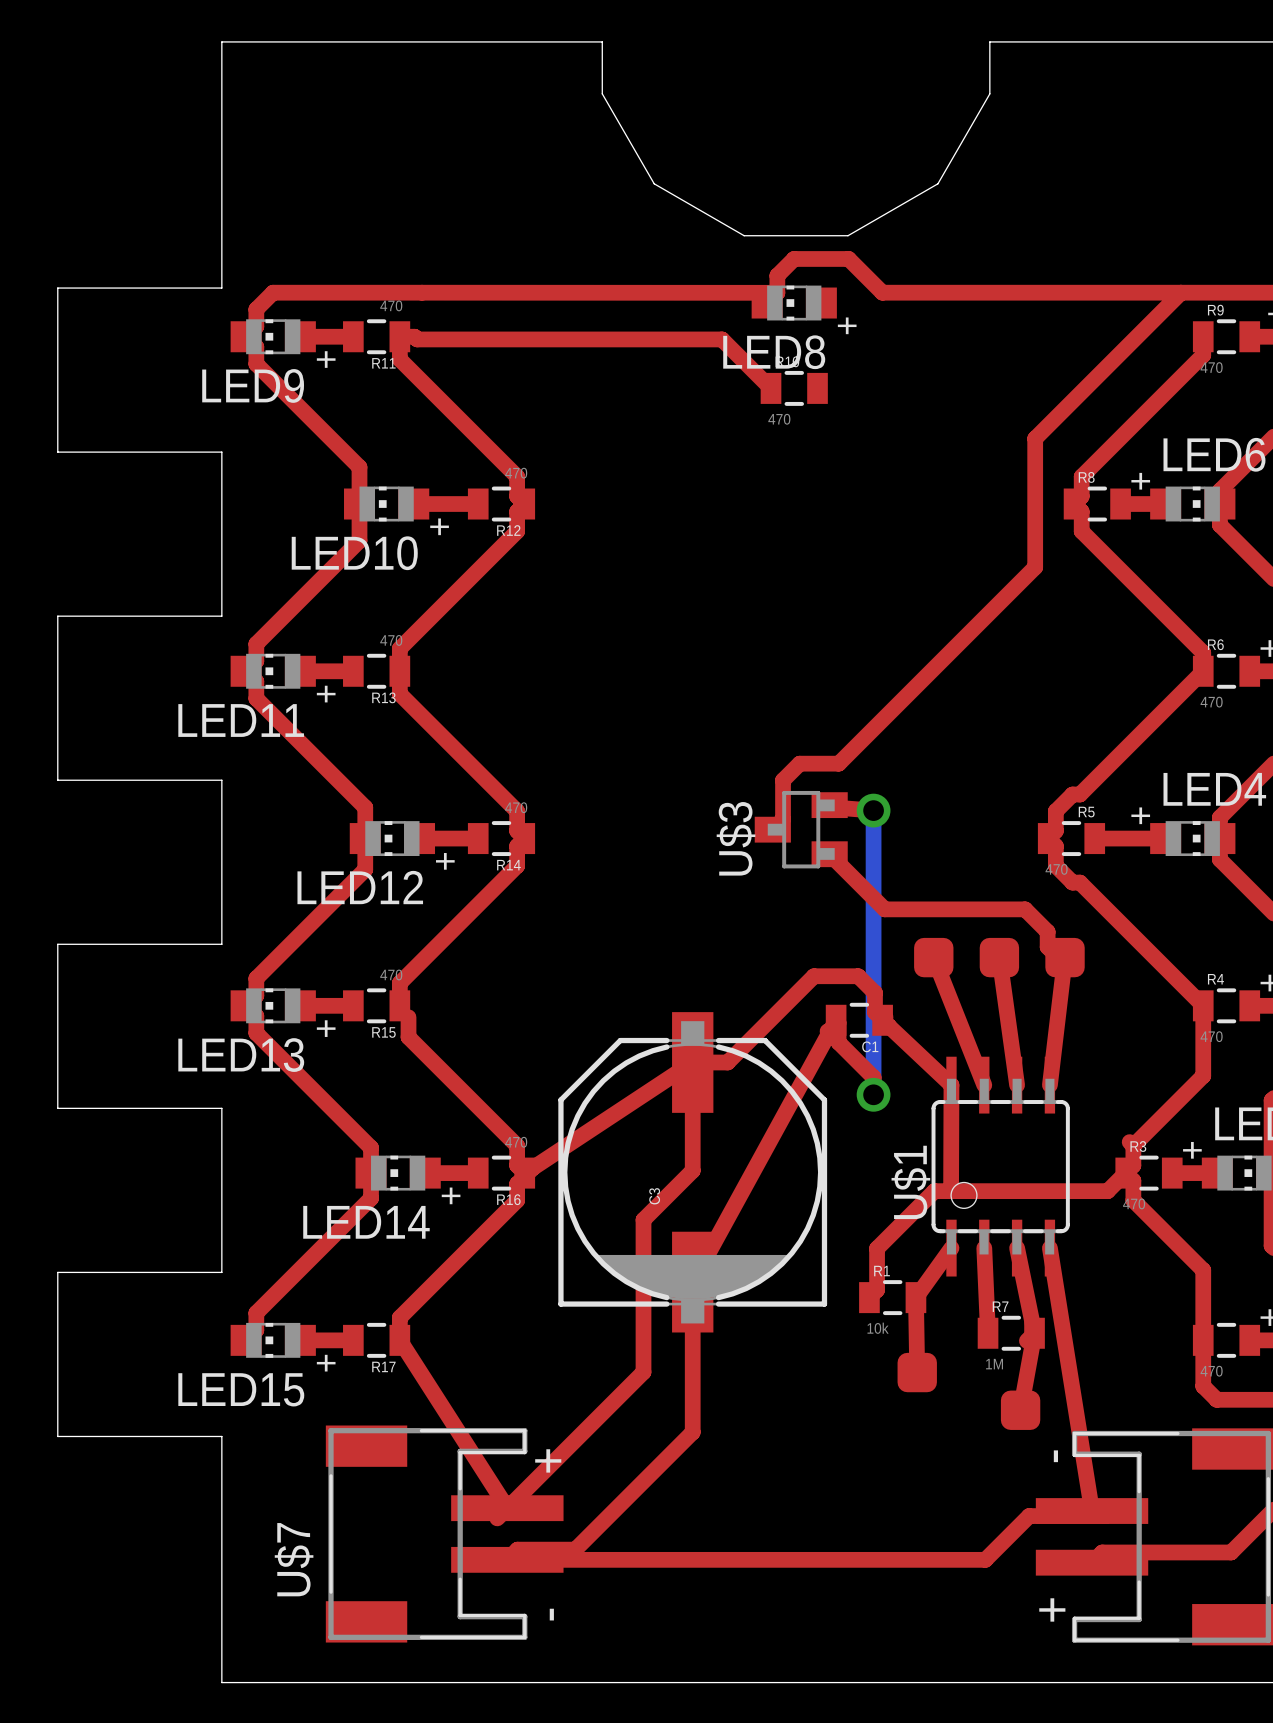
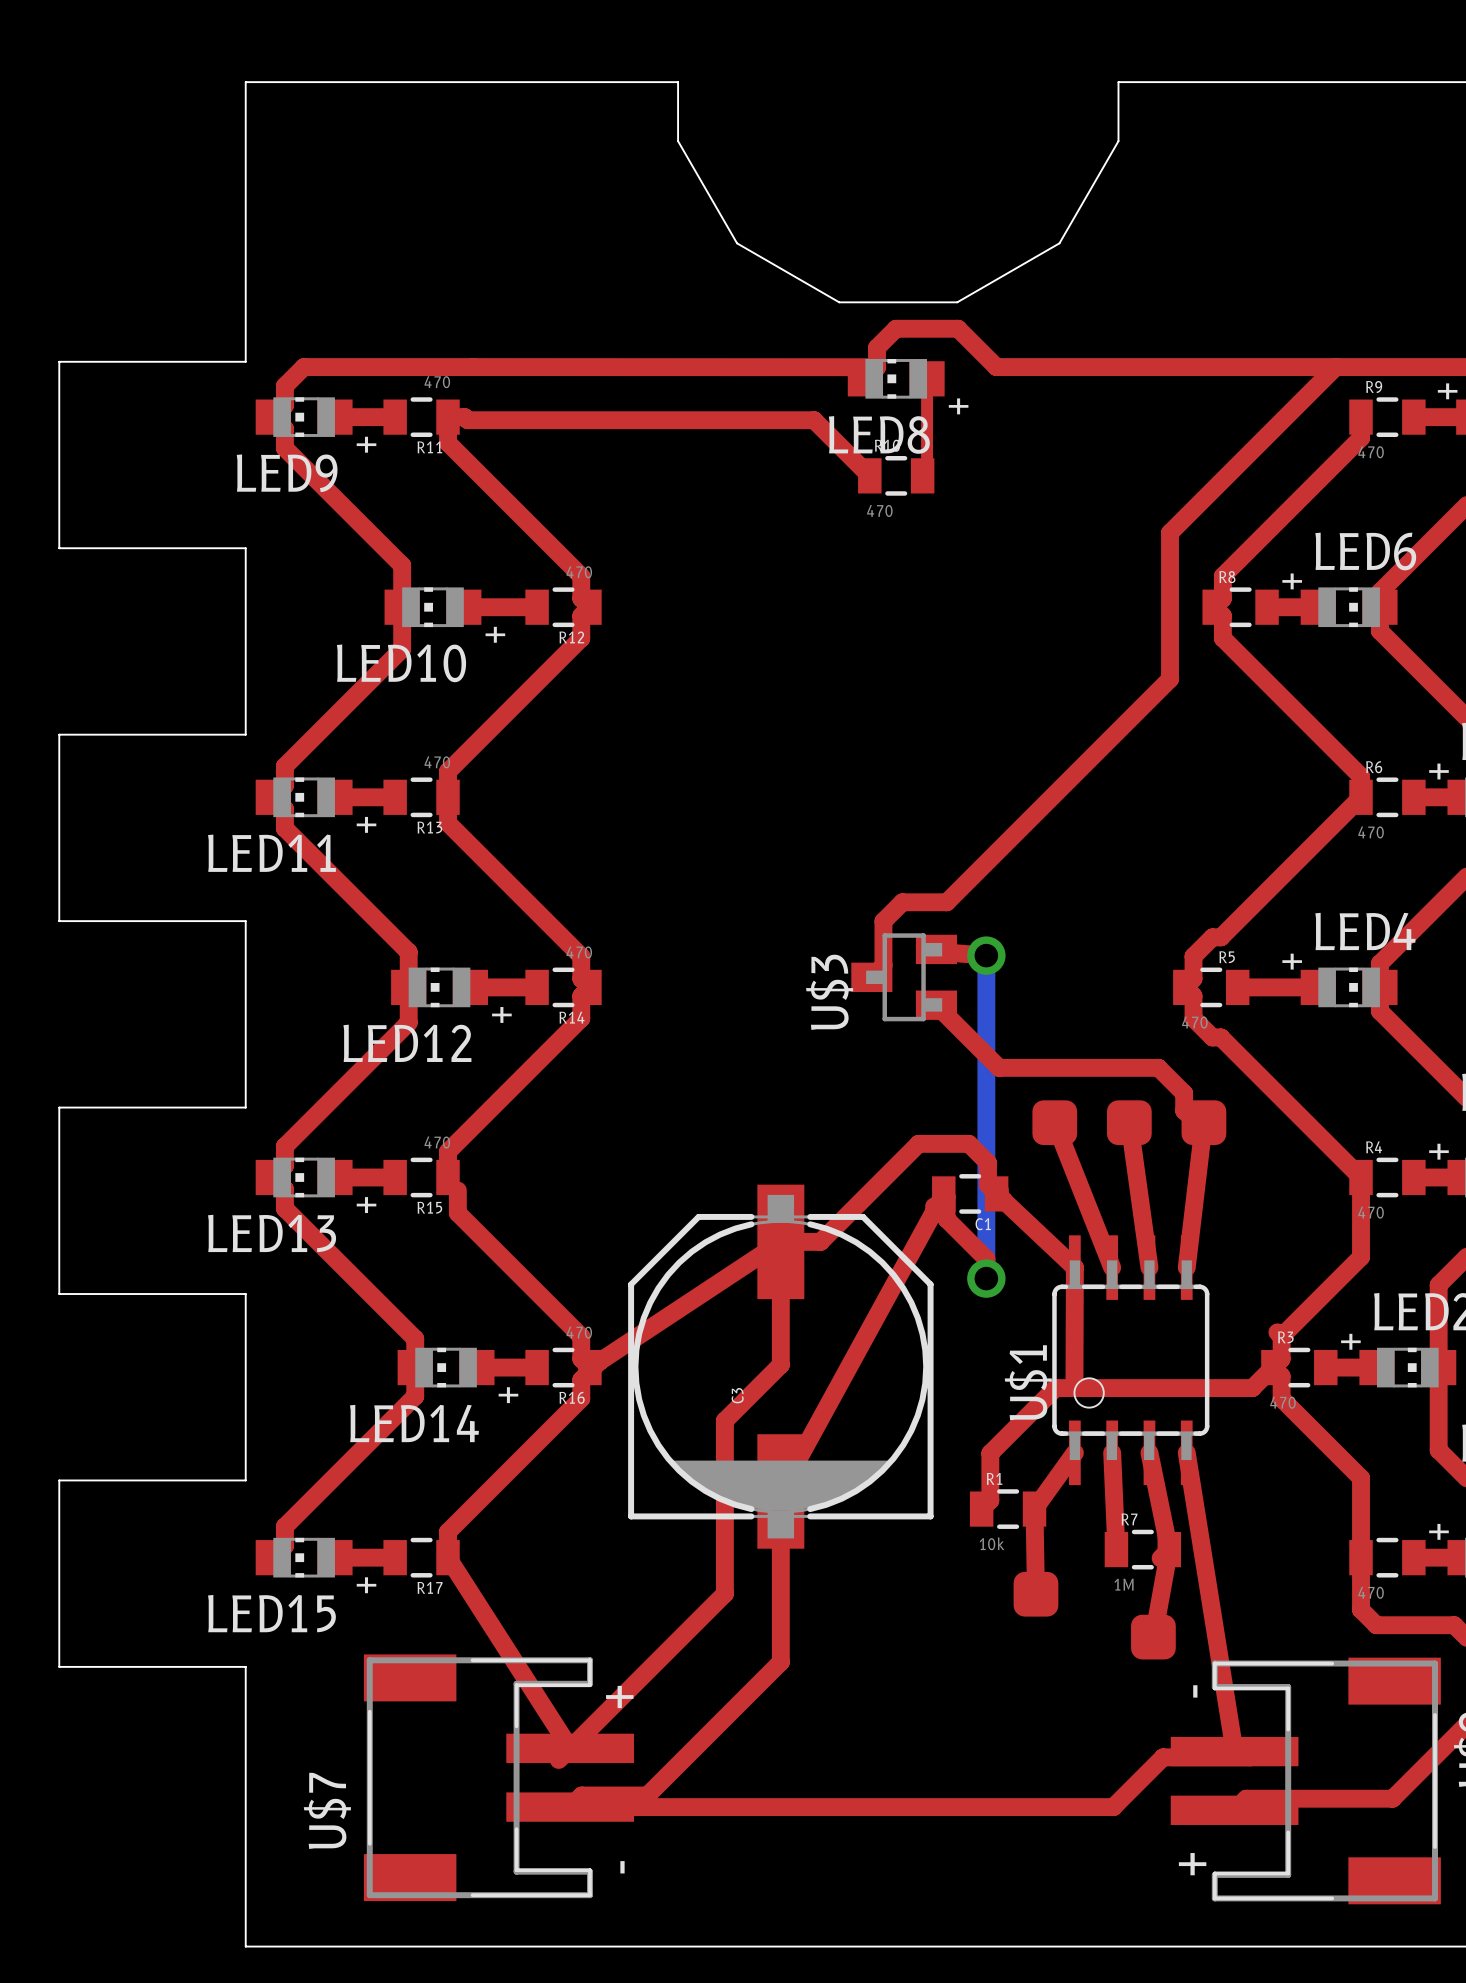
top track: none -> (927, 378) (927, 471) (922, 475)

